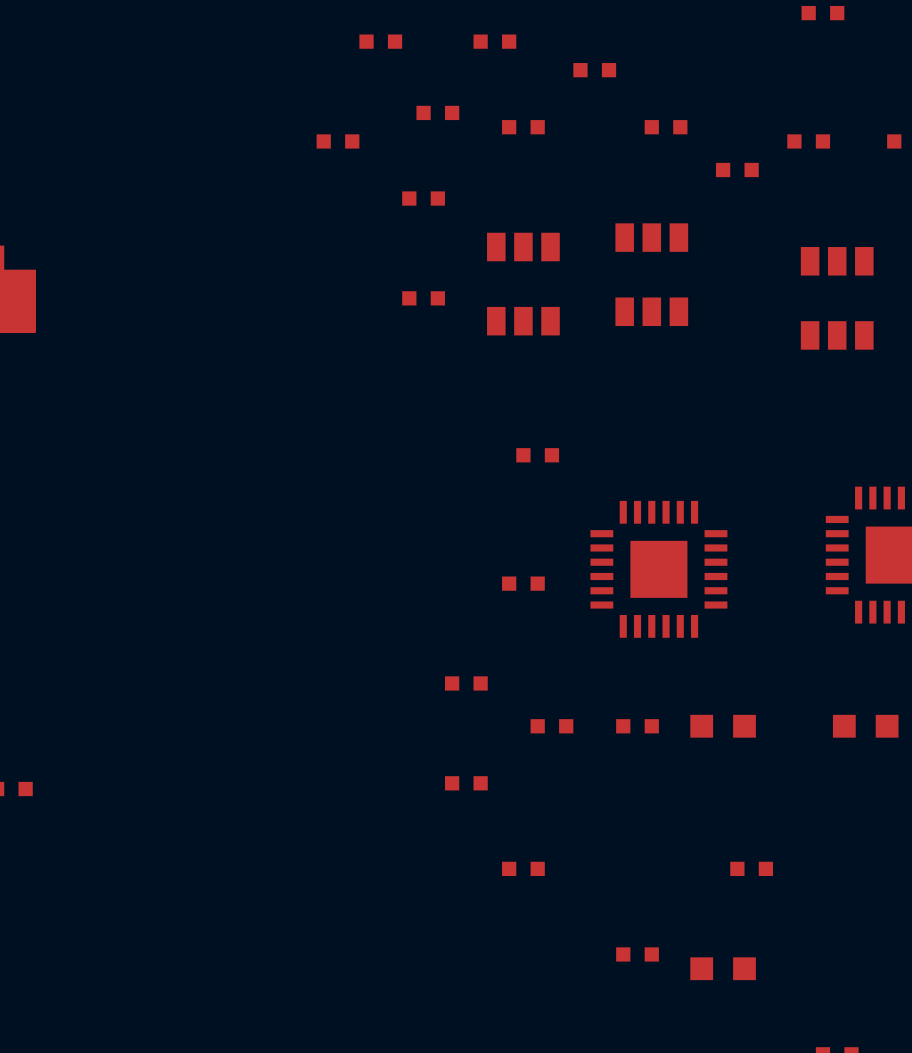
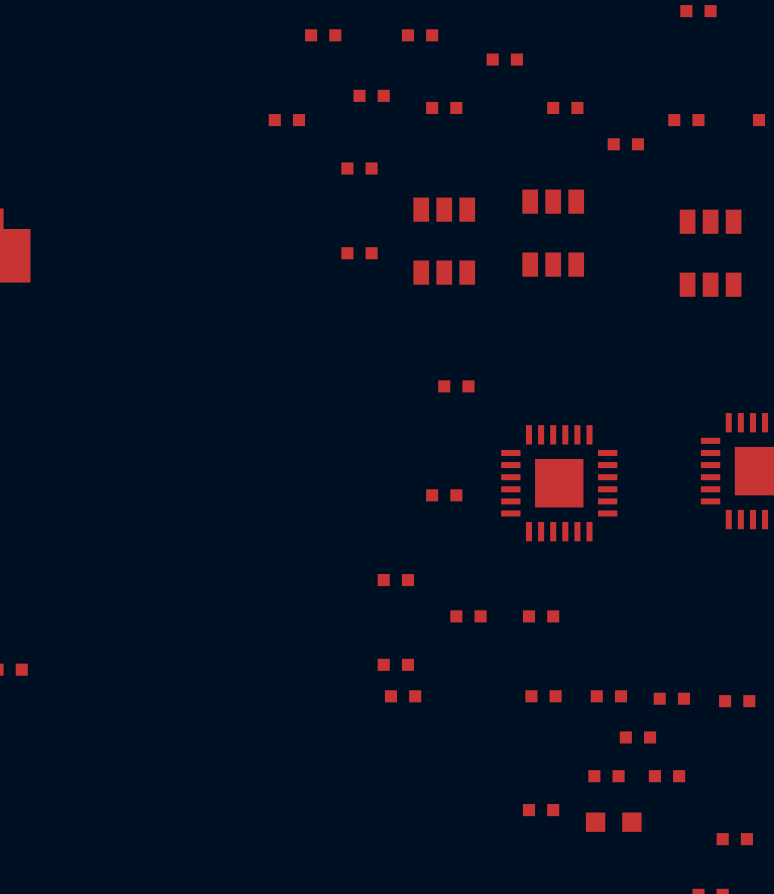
part: (723, 726) -> none
part: (865, 726) -> none
part: none -> (403, 696)
part: none -> (543, 696)
part: none -> (608, 696)
part: none -> (671, 698)
part: none -> (737, 701)
part: (523, 868) -> none
part: none -> (606, 776)
part: none -> (666, 776)
part: none -> (734, 839)

